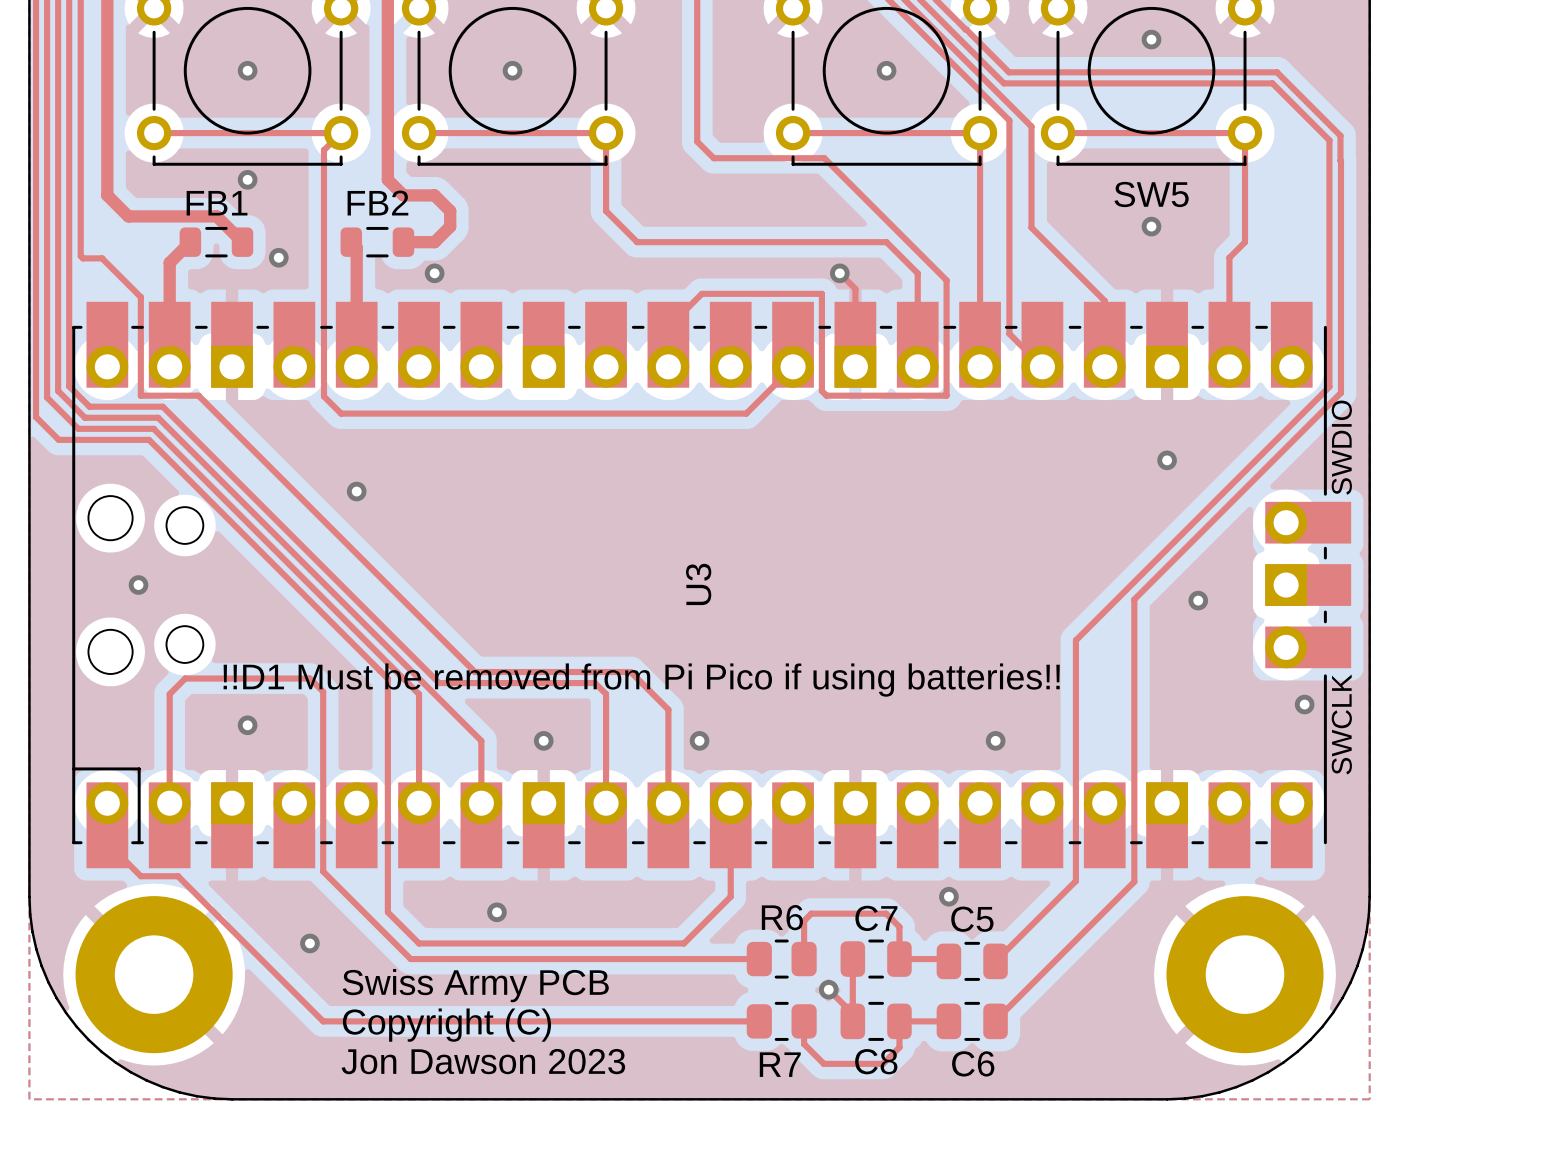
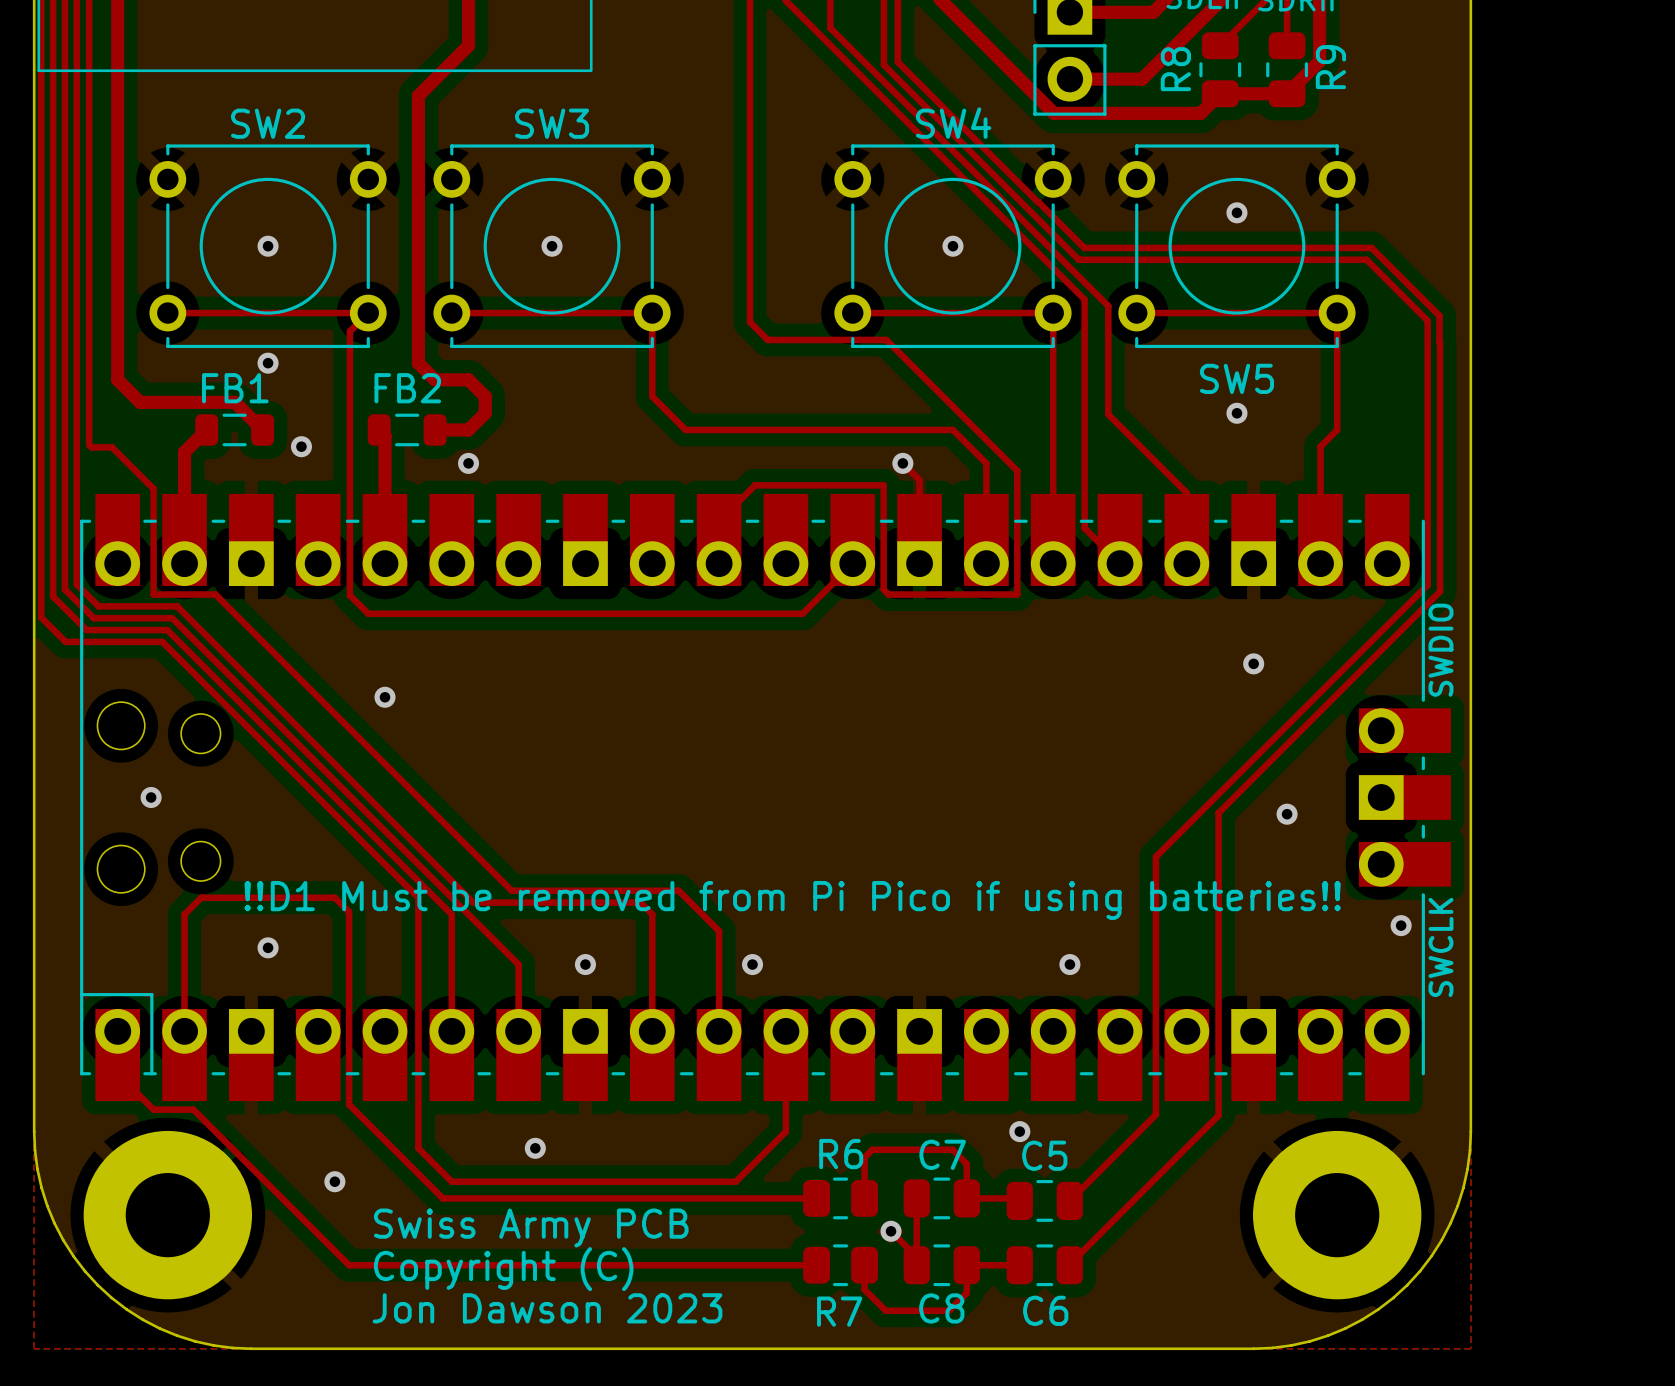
U3 name: U3 (698, 584) -> none

